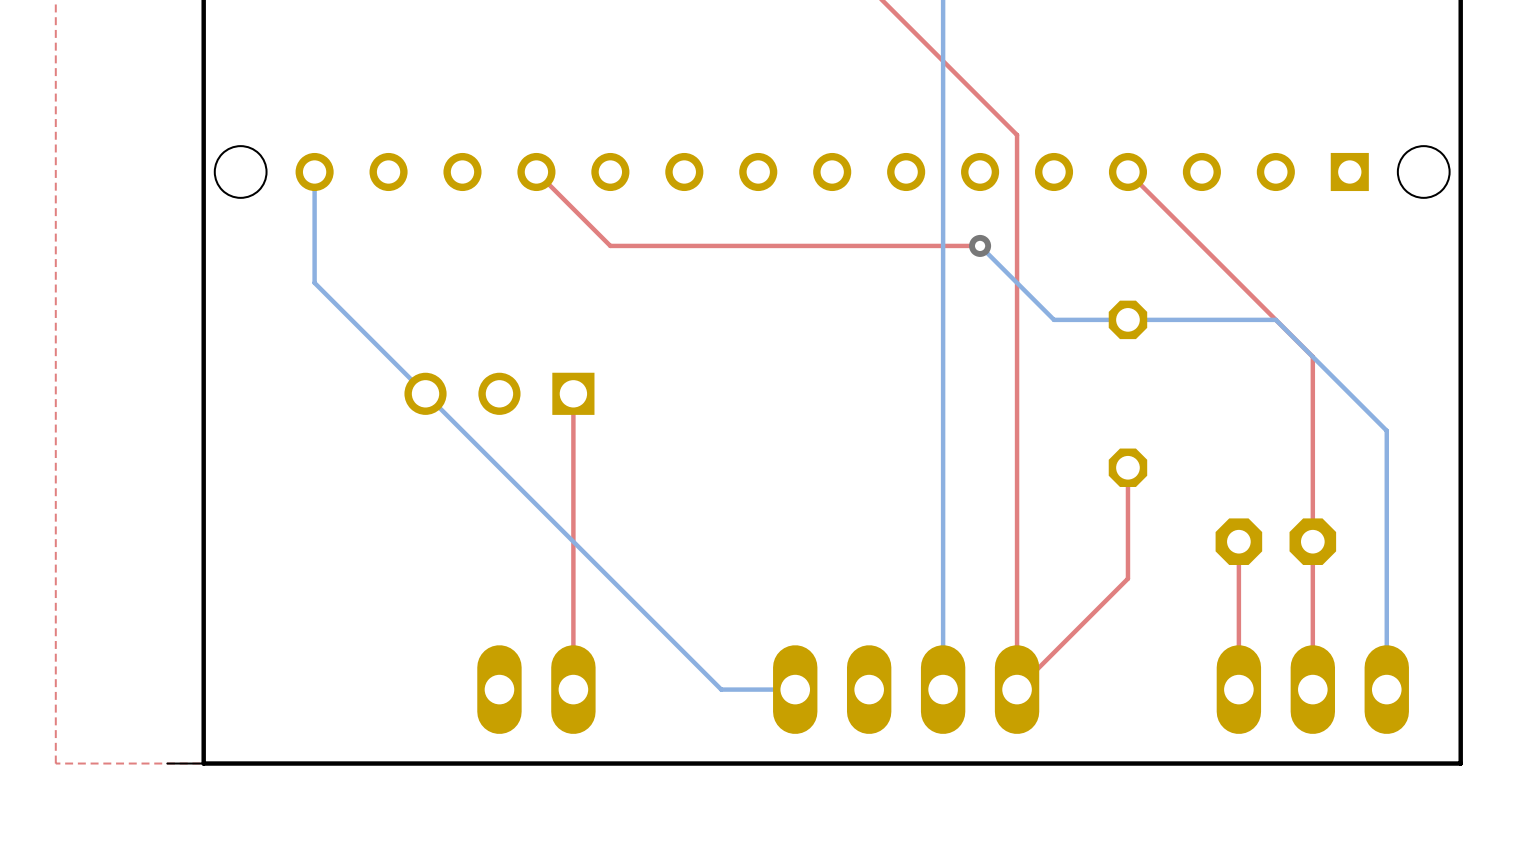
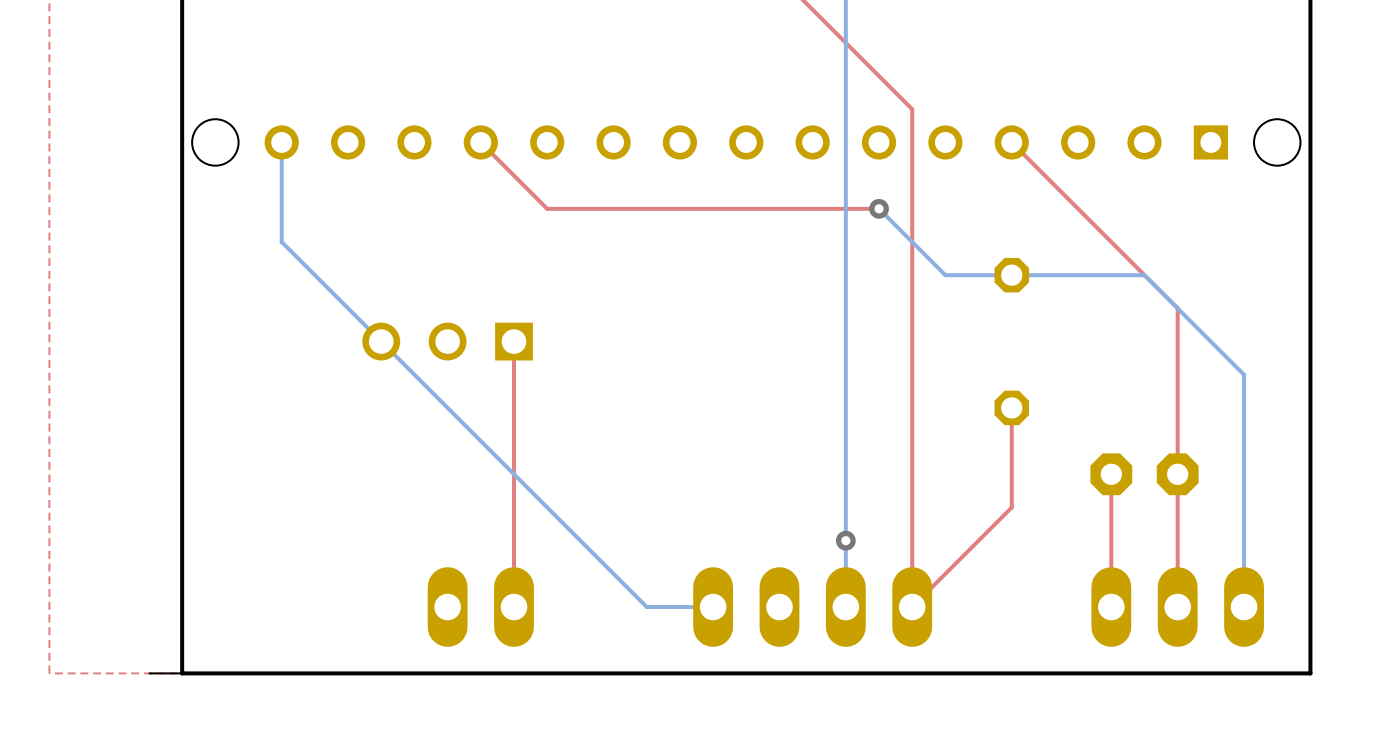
via: none -> (845, 540)

